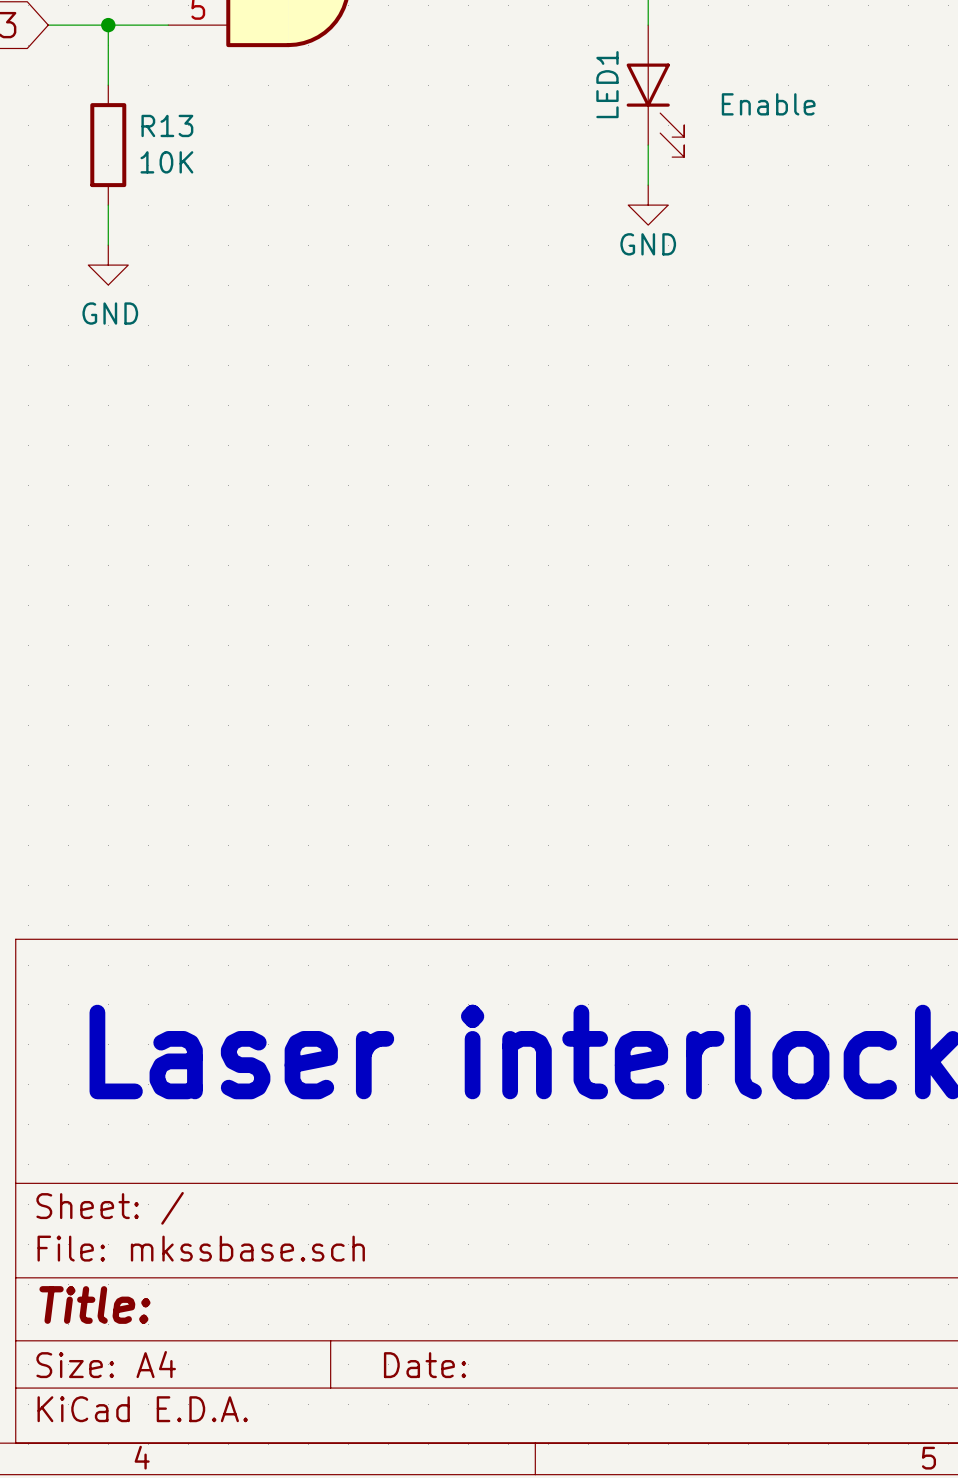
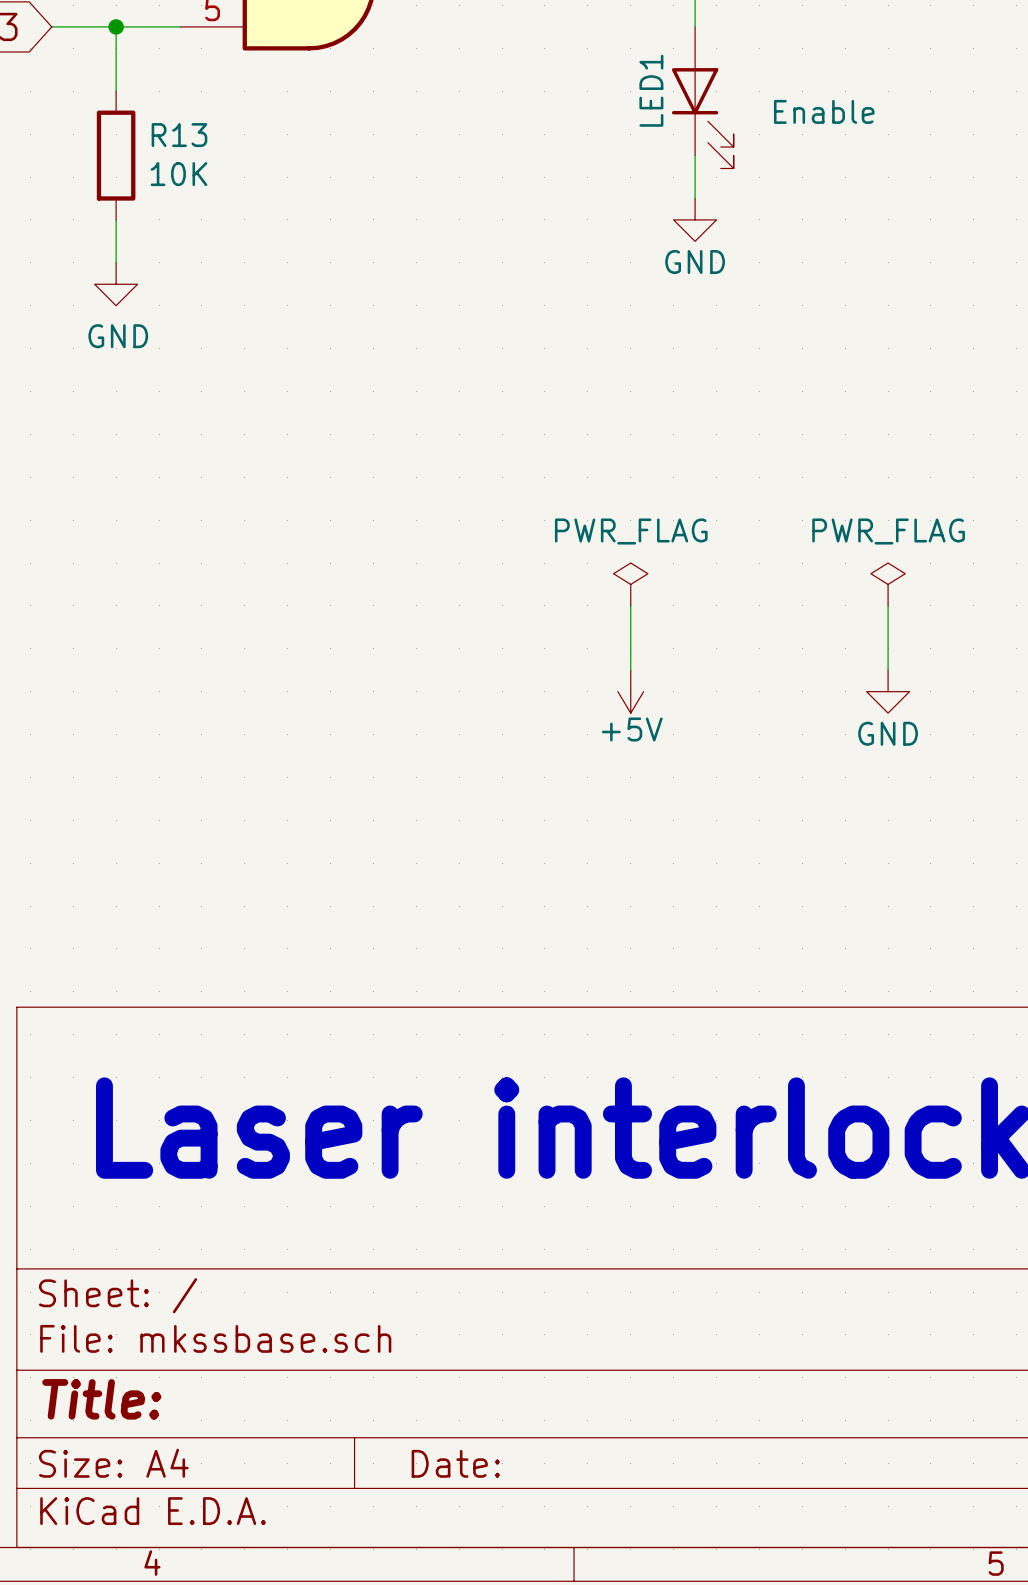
power symbol: none -> PWR_FLAG (630, 584)
power symbol: none -> PWR_FLAG (888, 584)
wire: none -> (630, 605) (630, 670)
wire: none -> (888, 605) (888, 670)
power symbol: none -> +5V (630, 691)
power symbol: none -> GND (888, 691)

